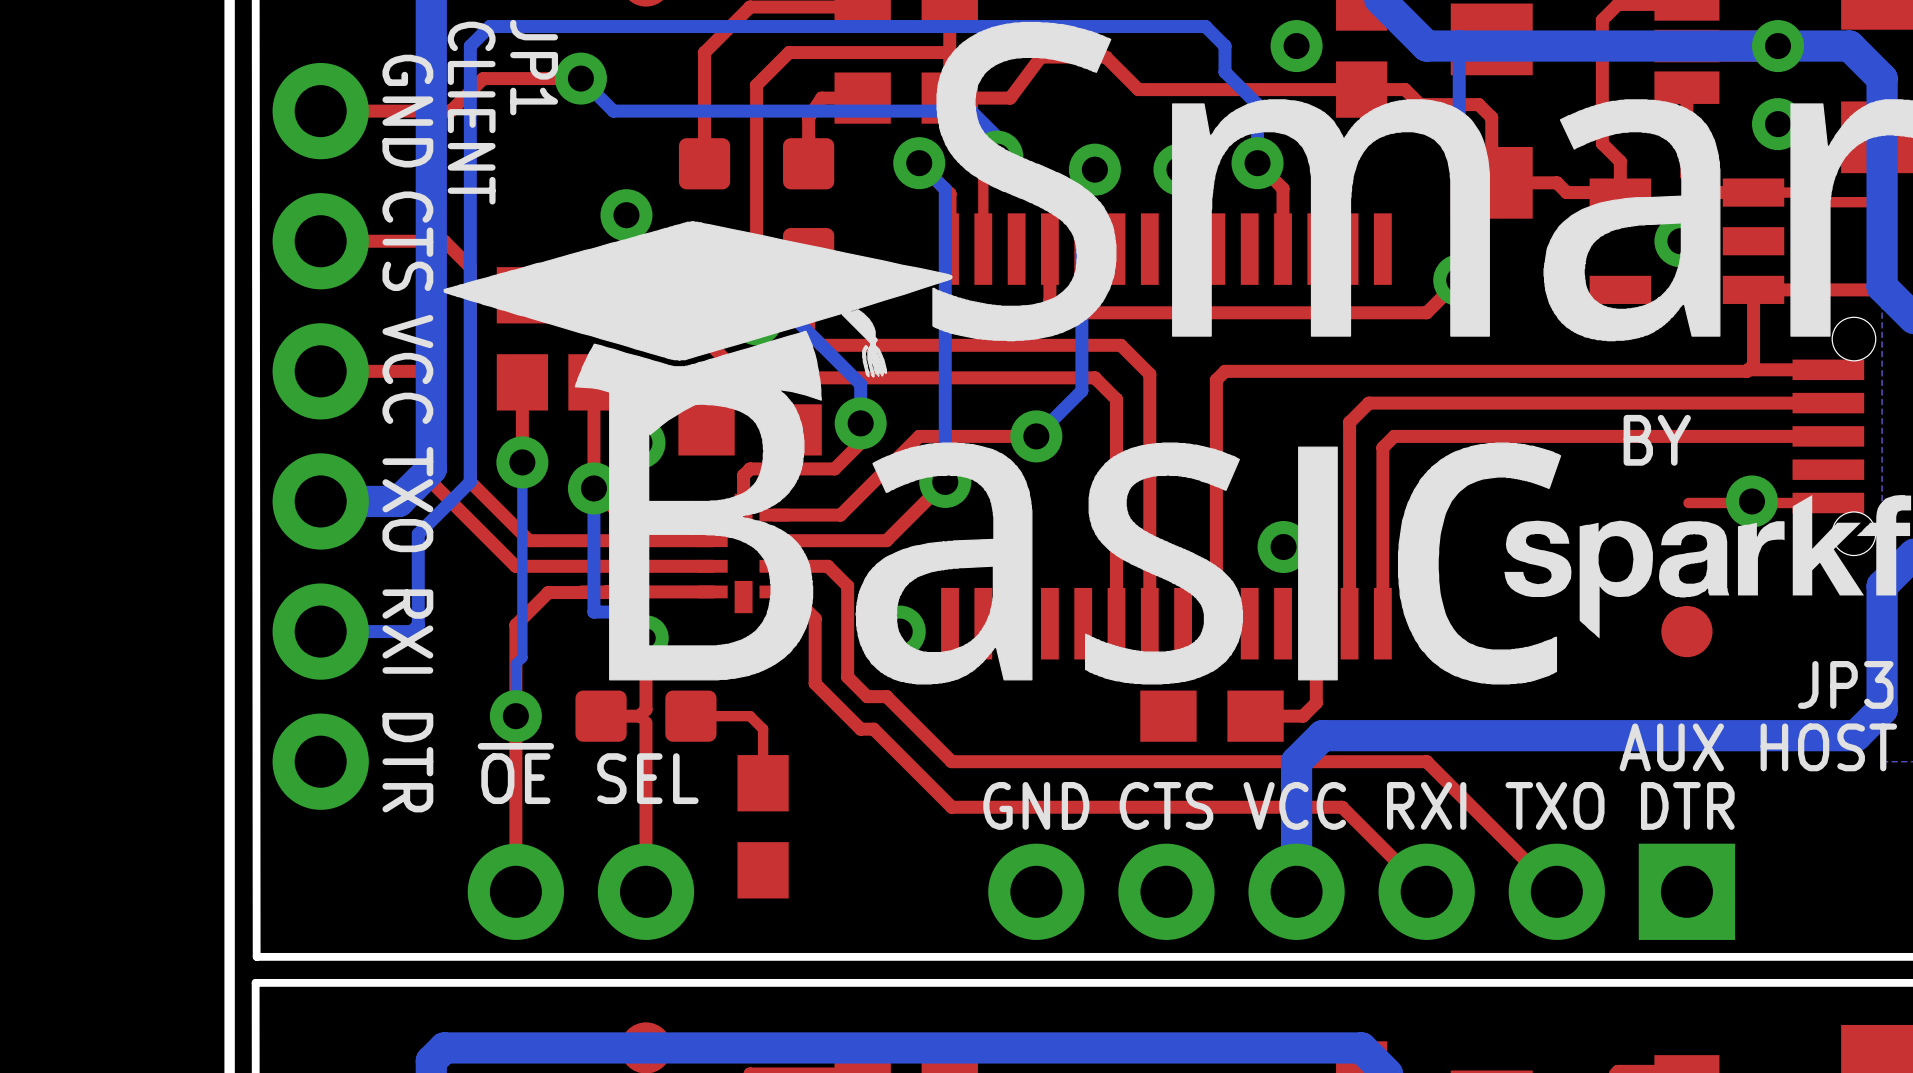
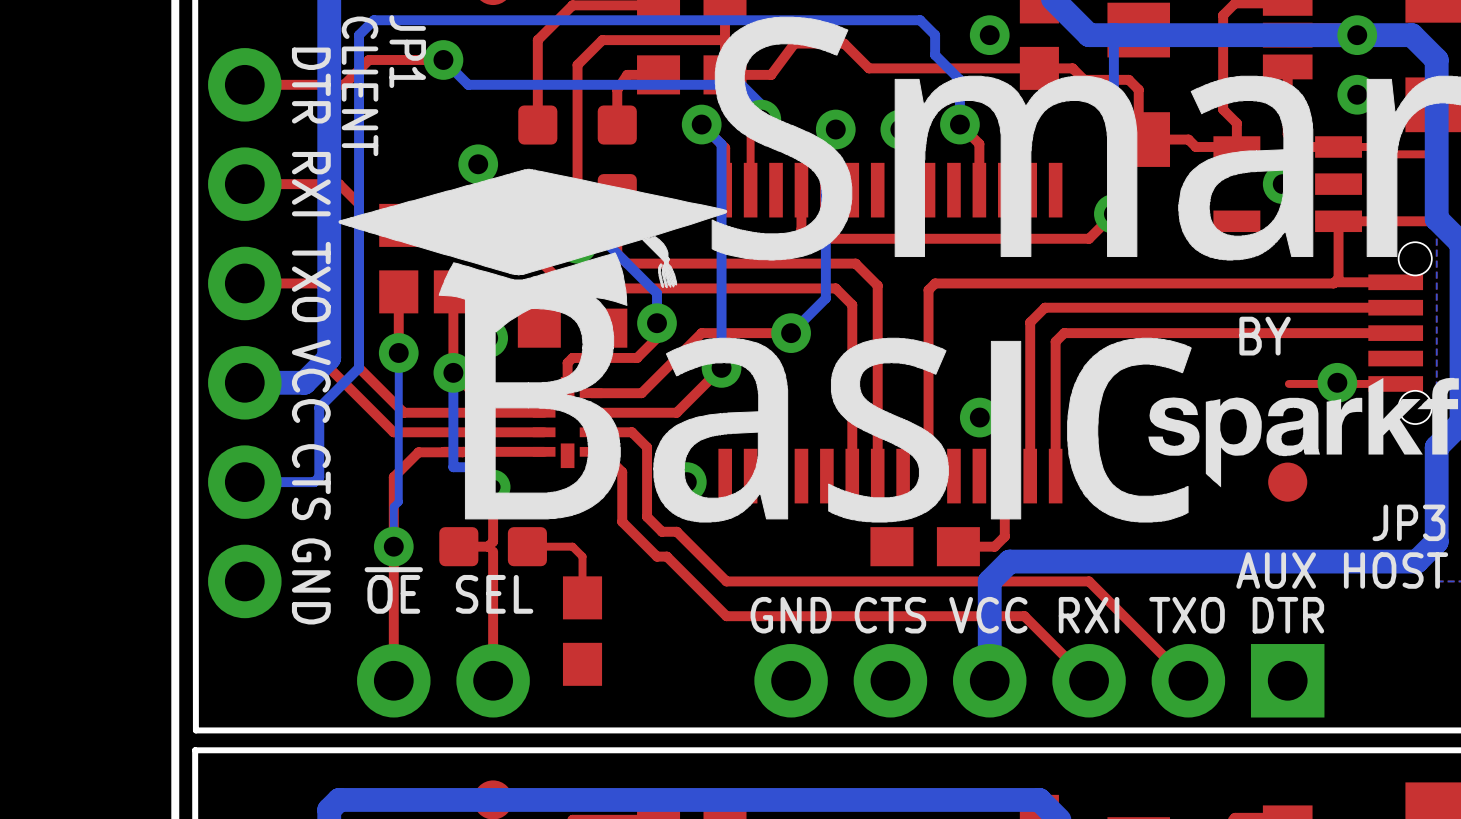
text: GND (407, 111) -> DTR (311, 85)
text: CTS (407, 241) -> RXI (311, 184)
text: VCC (407, 369) -> TXO (311, 282)
text: TXO (407, 499) -> VCC (311, 381)
text: RXI (407, 631) -> CTS (311, 482)
text: DTR (407, 762) -> GND (311, 581)

